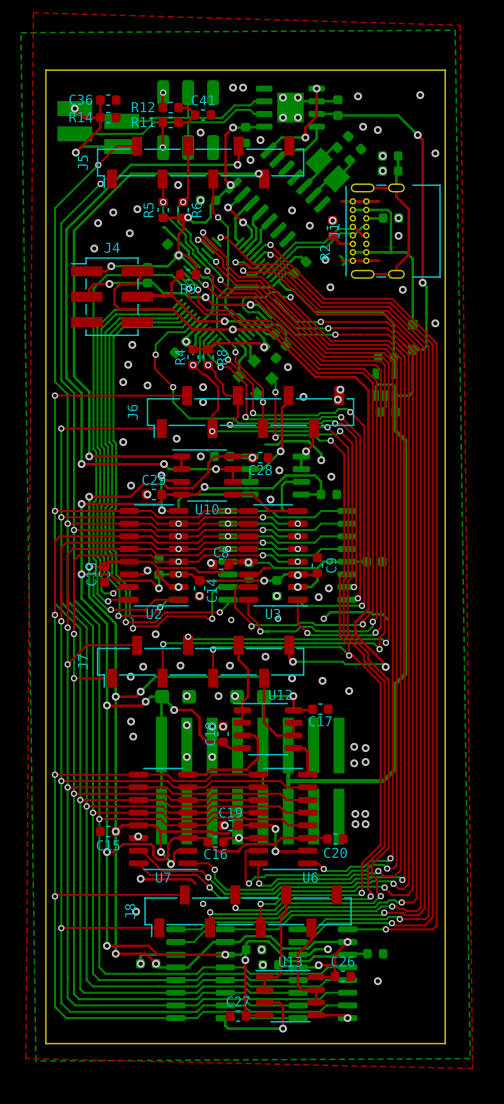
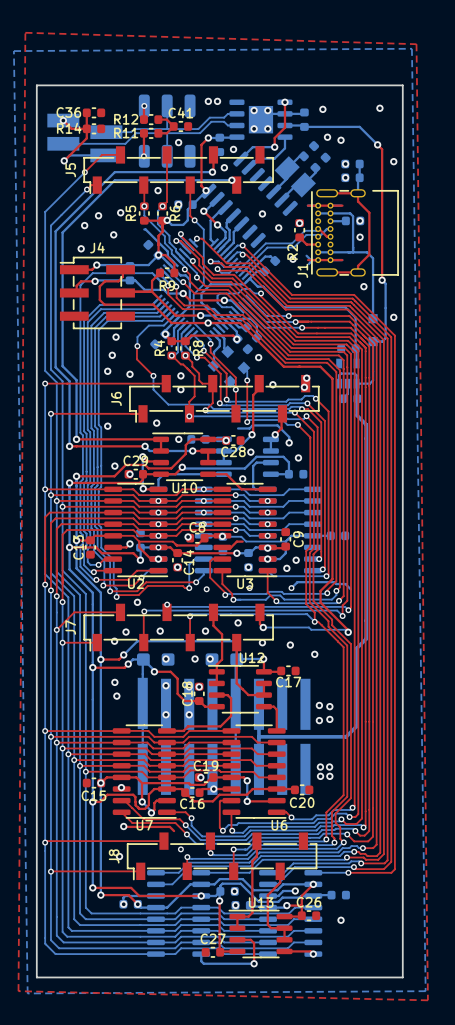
J1 name position: J1 (334, 231) -> J1 (302, 270)

